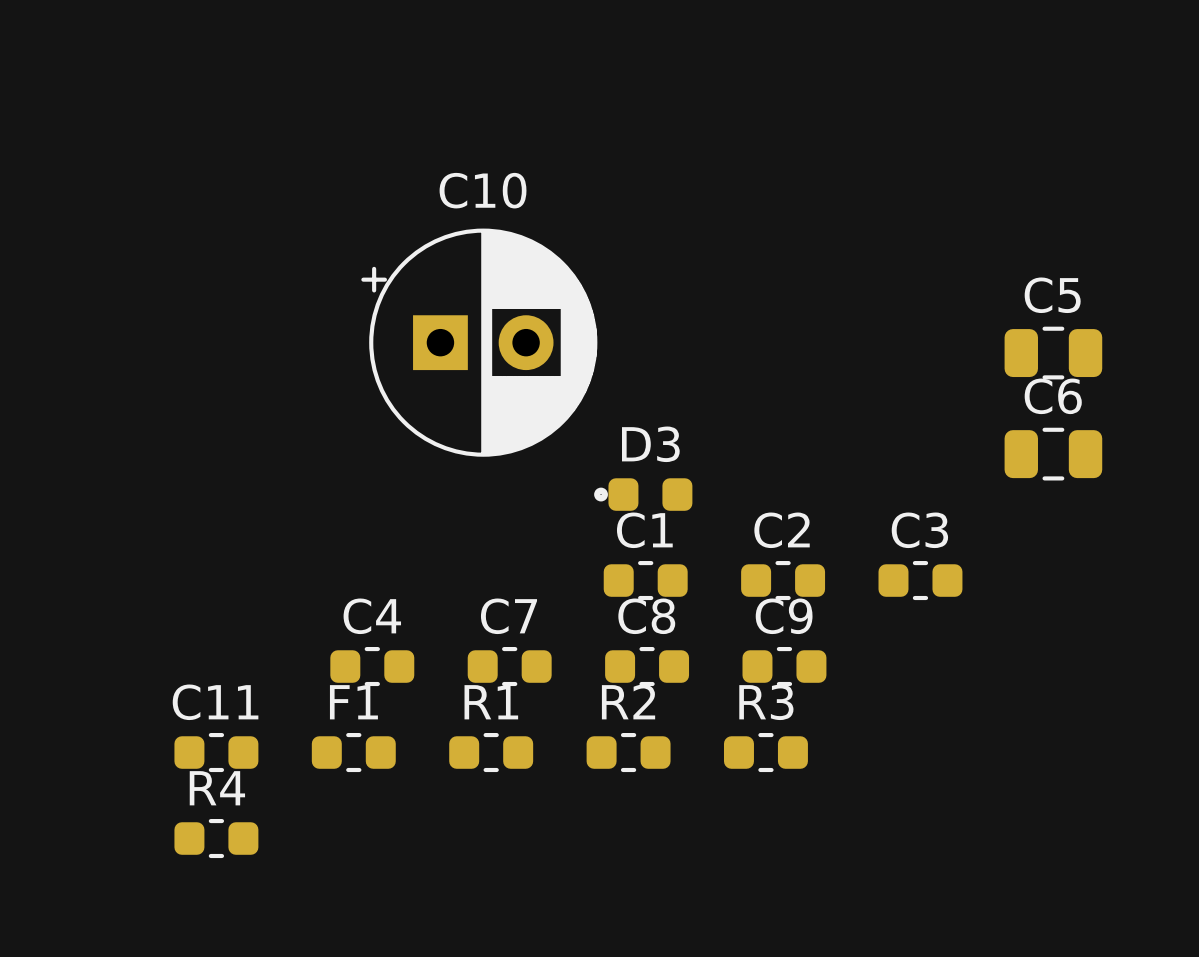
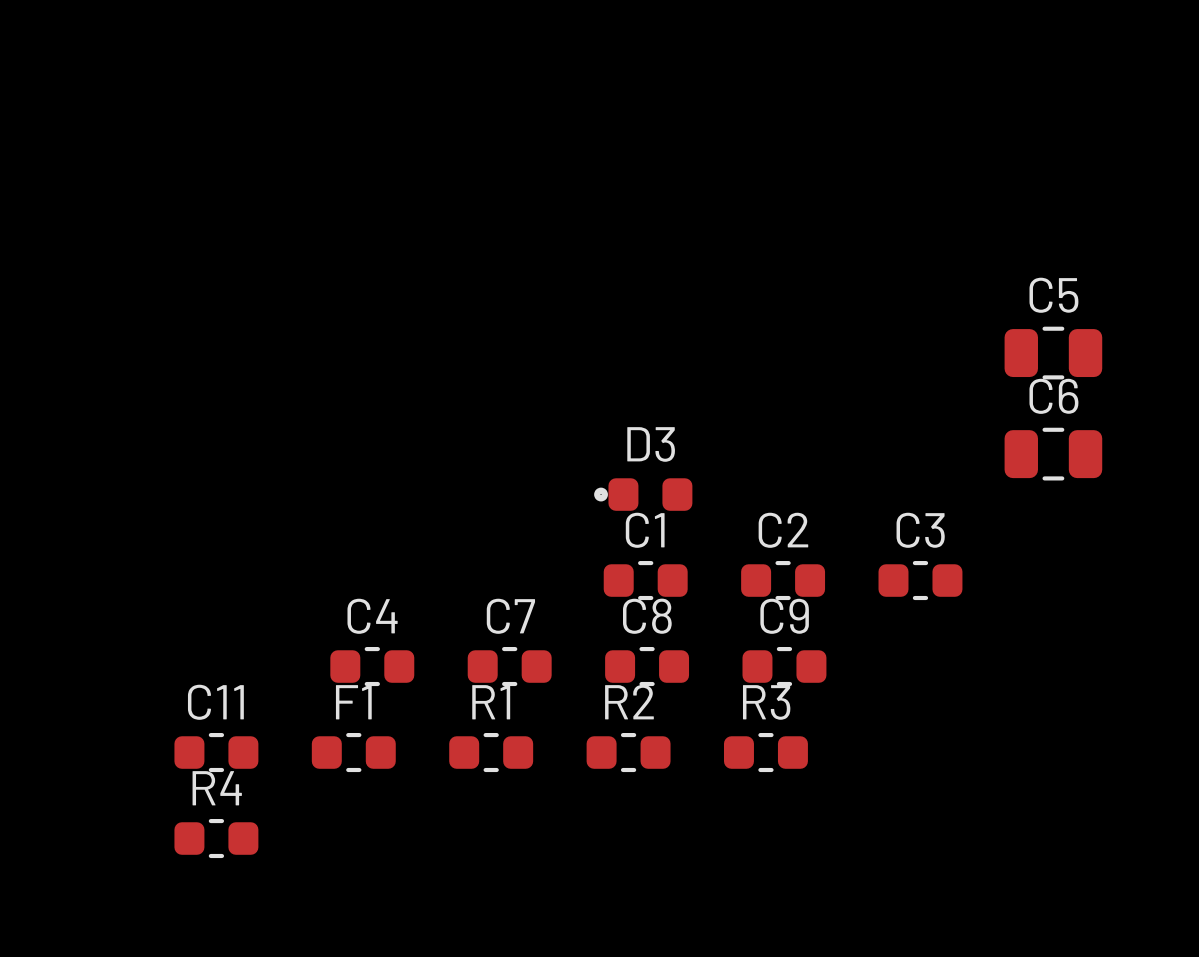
C10: (479, 342) -> none

